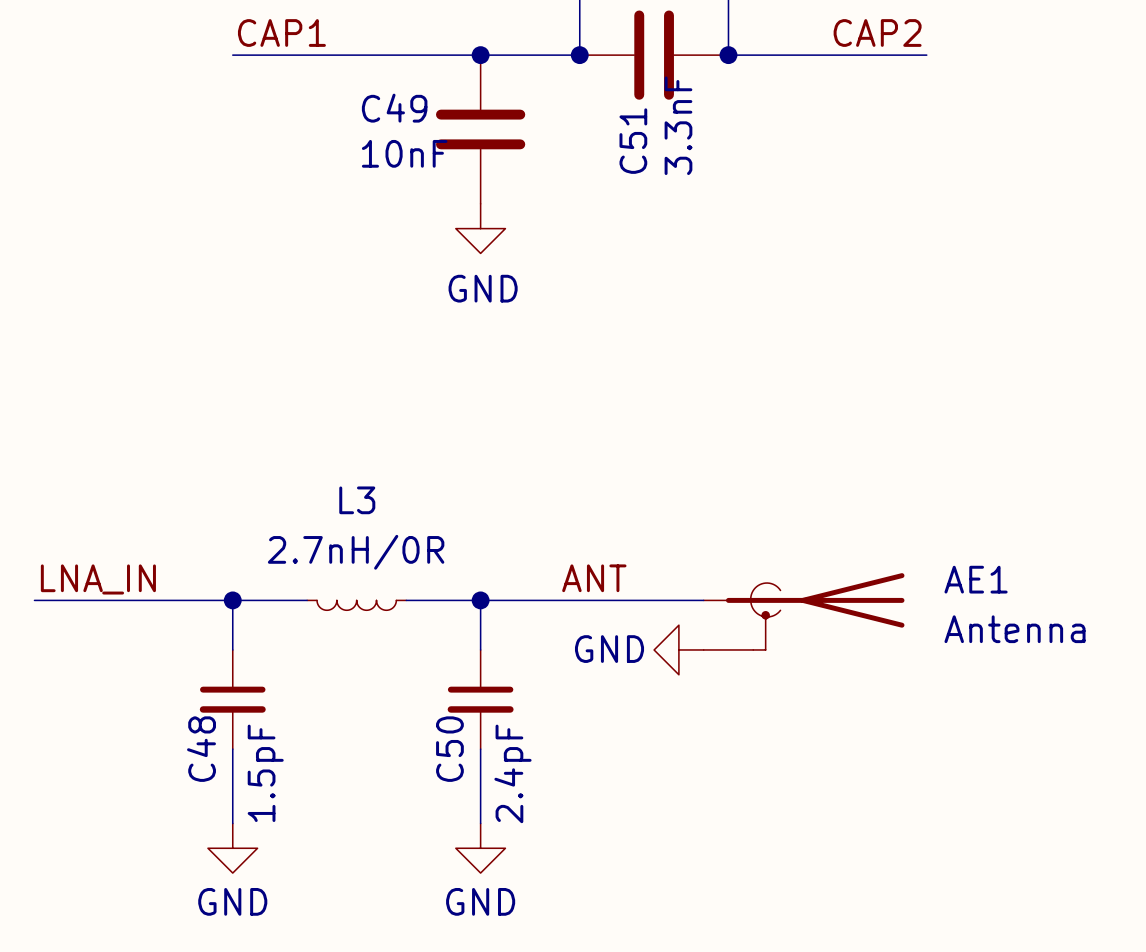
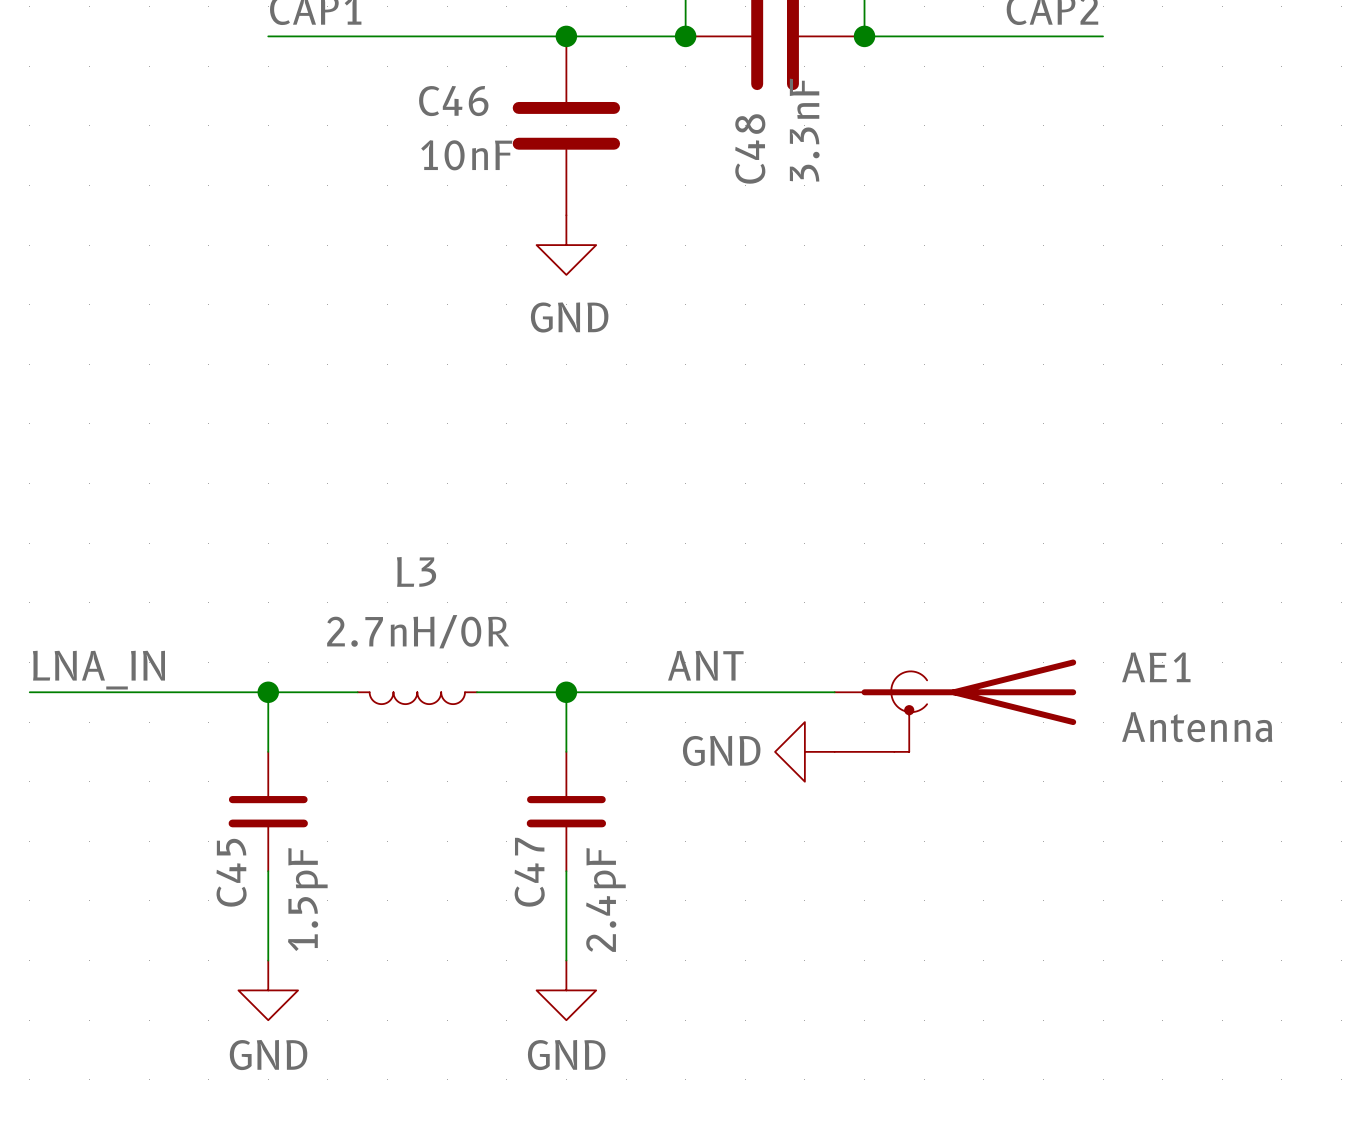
C49 name: C49 (394, 108) -> C46 (453, 101)
C51 name: C51 (633, 141) -> C48 (750, 148)
C48 name: C48 (201, 749) -> C45 (231, 872)
C50 name: C50 (449, 749) -> C47 (529, 872)

